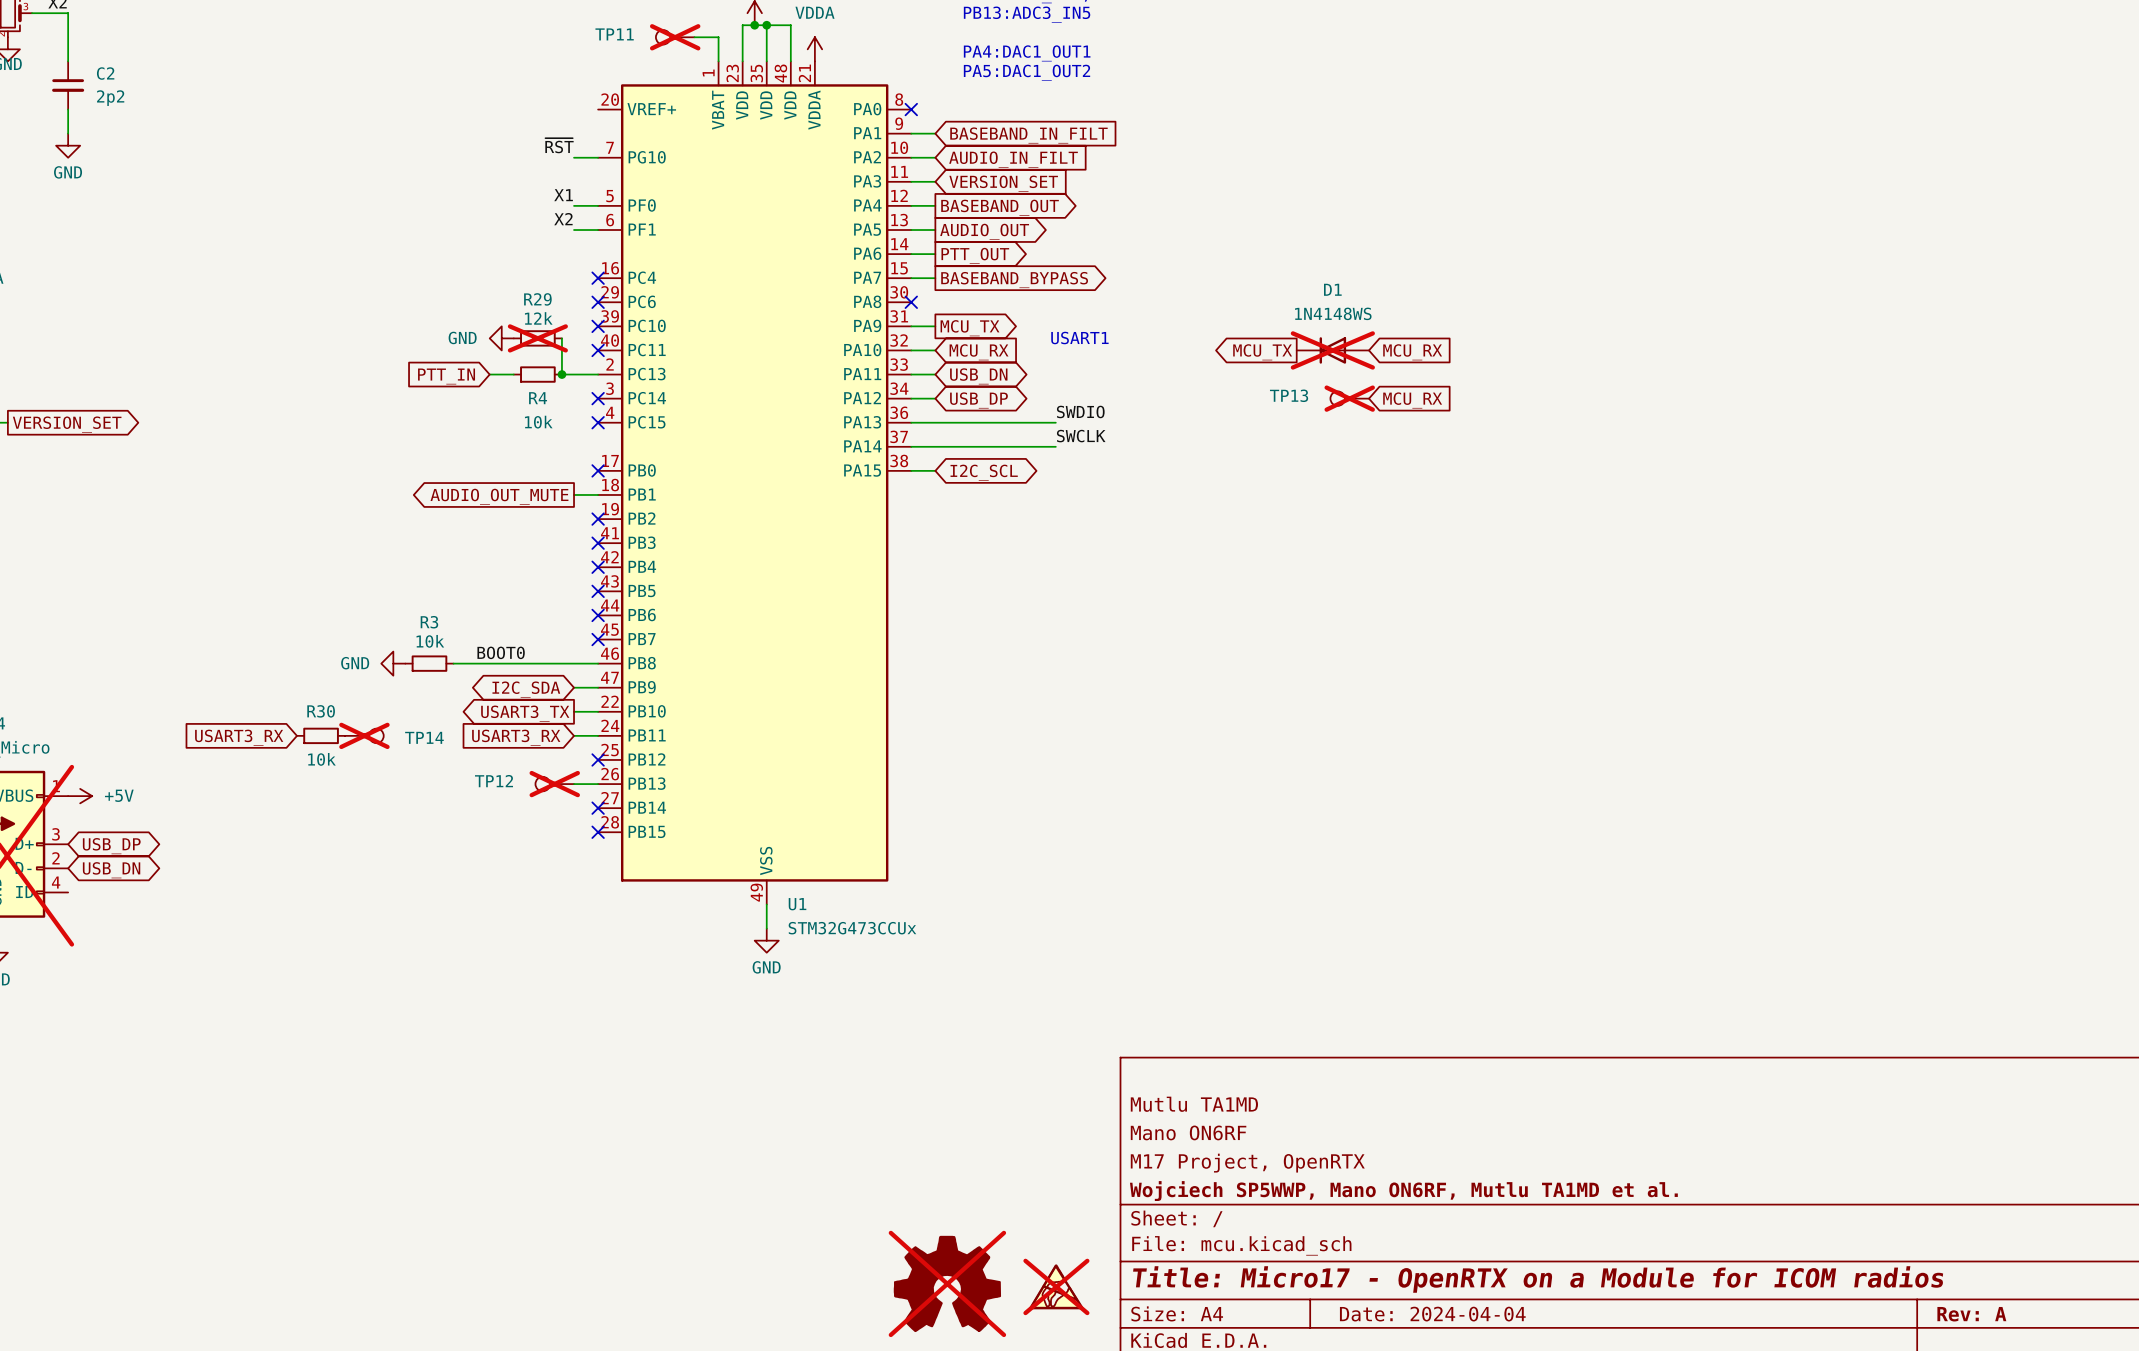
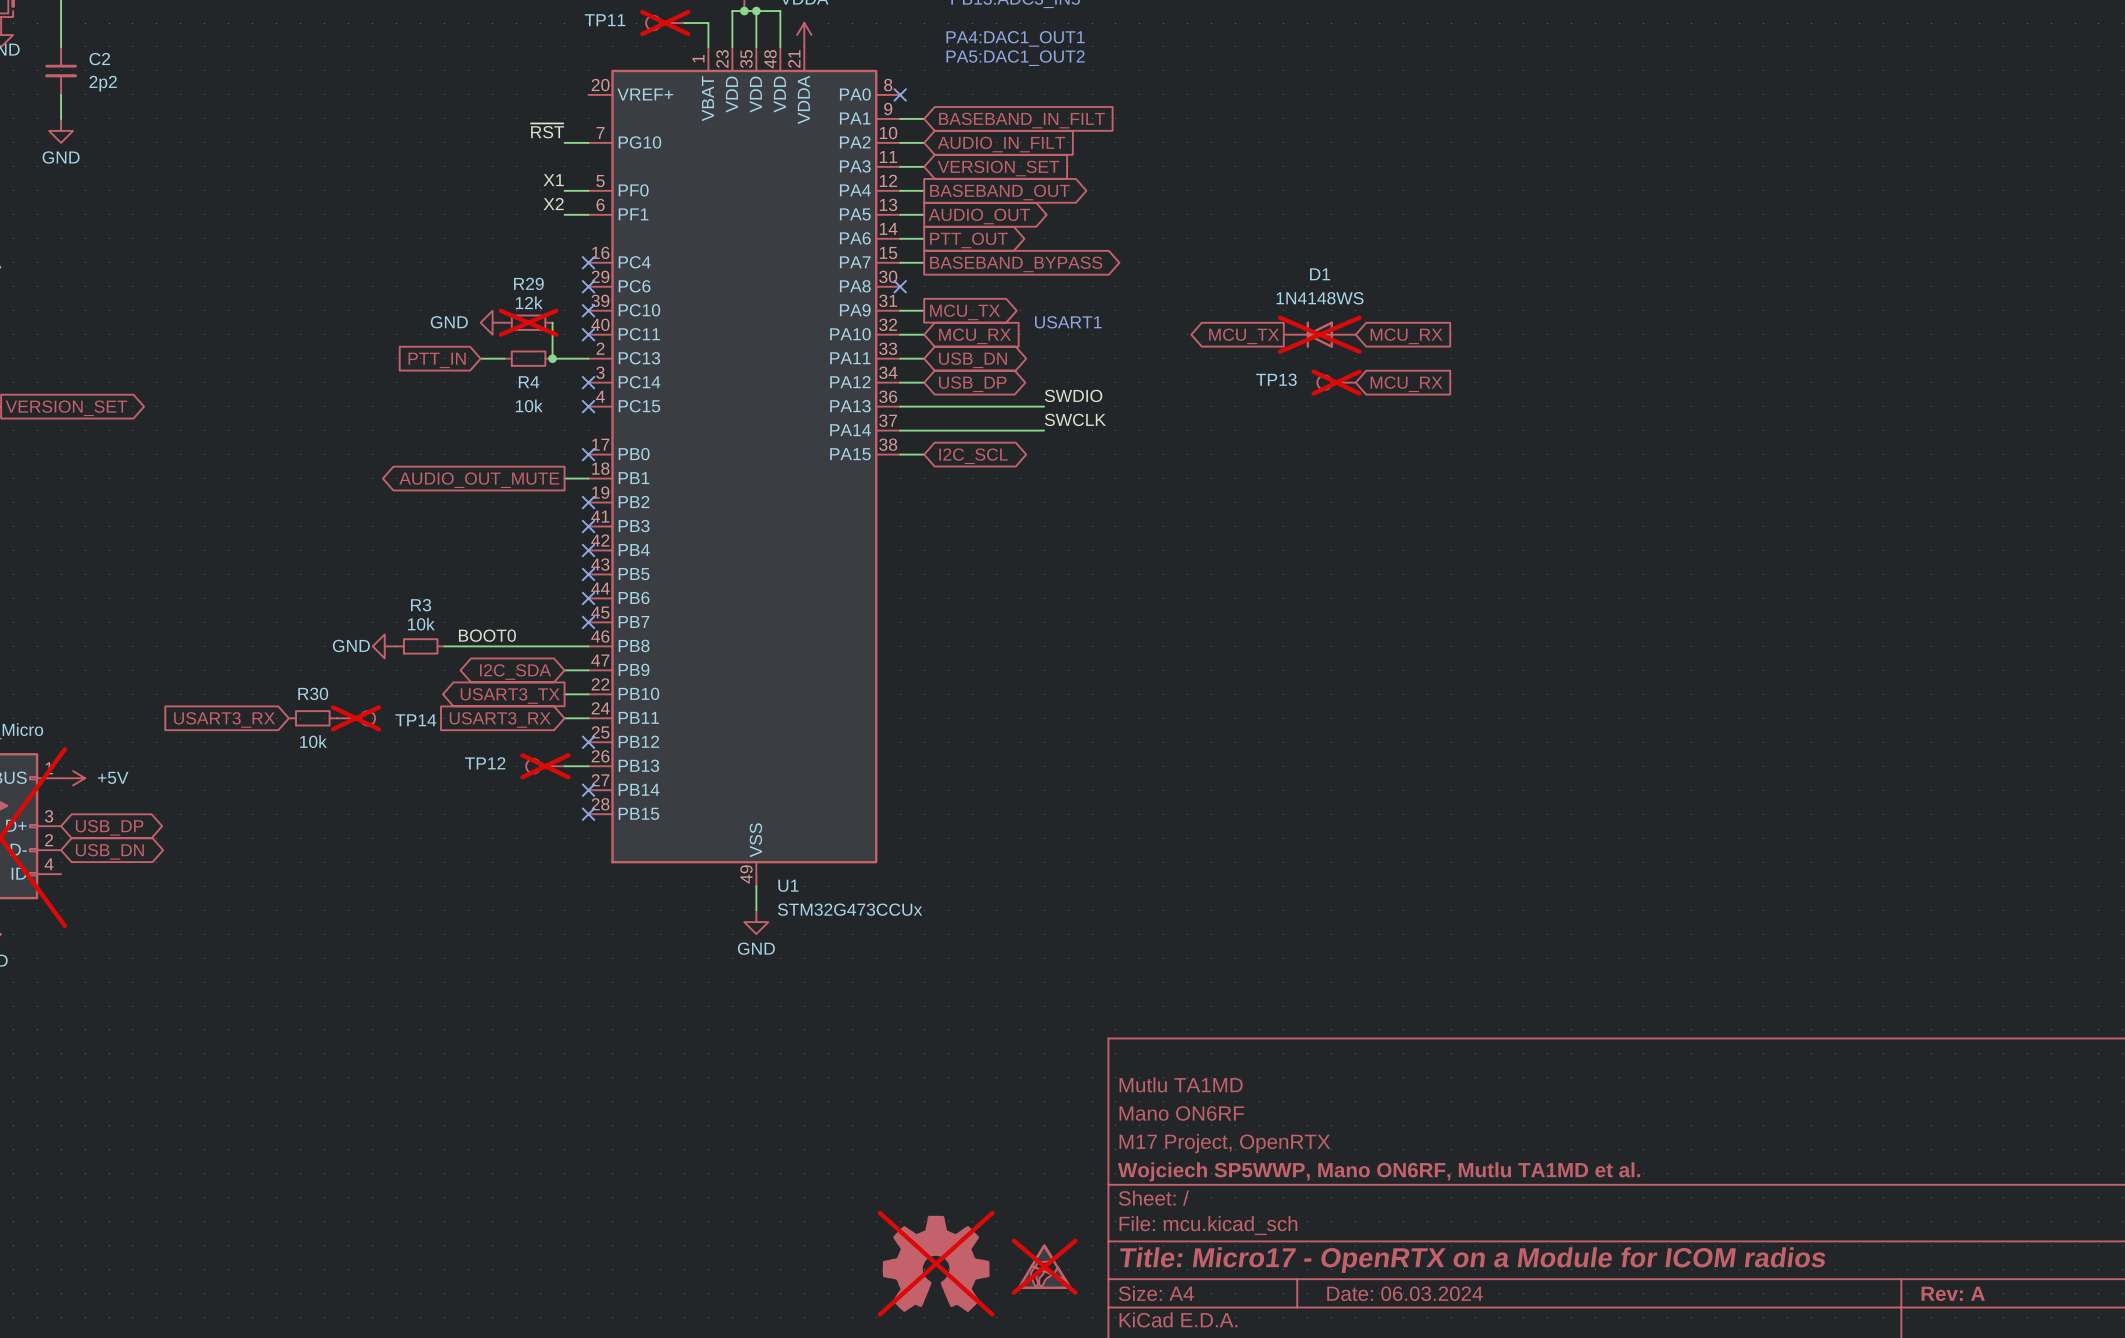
title block: Date: 2024-04-04 (1432, 1314) -> Date: 06.03.2024 (1405, 1293)

